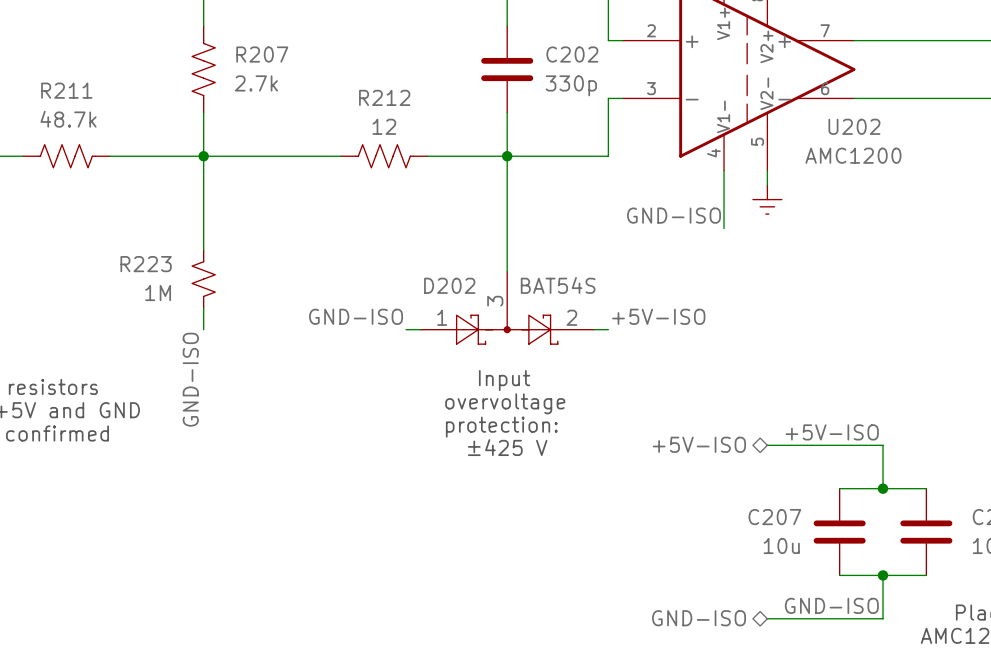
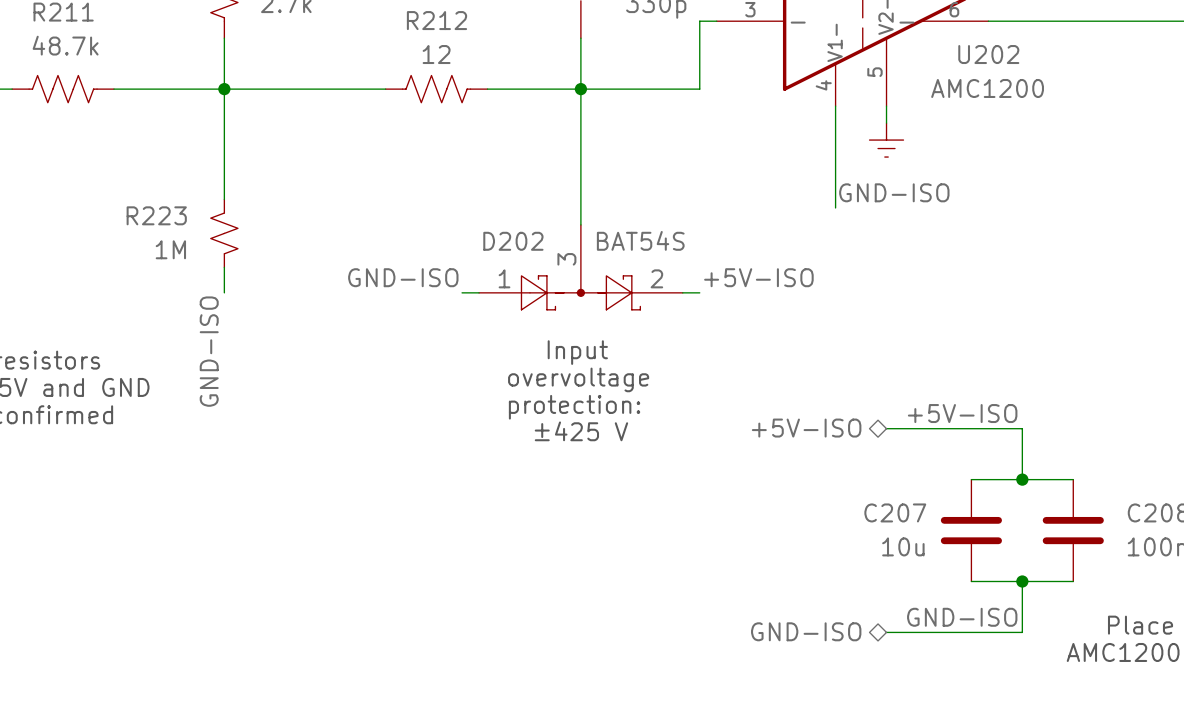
label position: GND-ISO (674, 215) -> GND-ISO (894, 192)
wire: none -> (835, 174) (835, 207)

